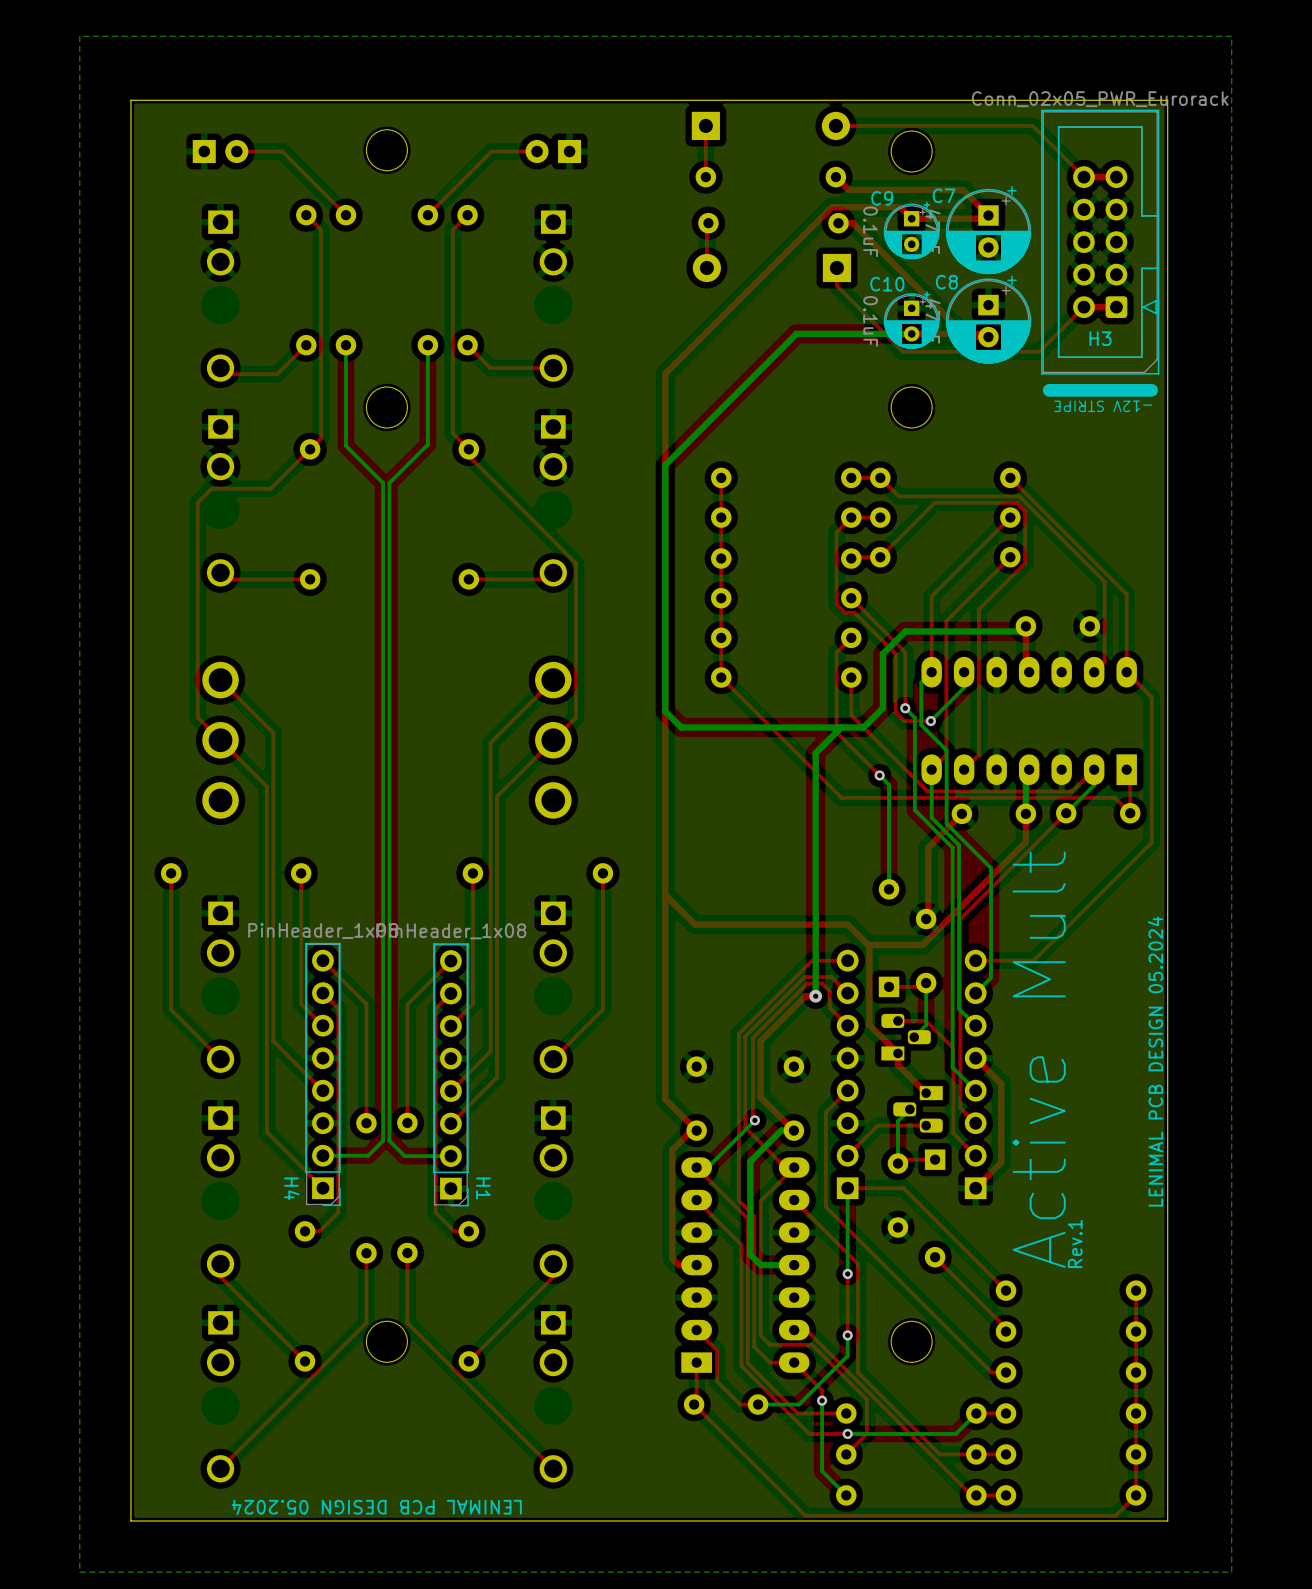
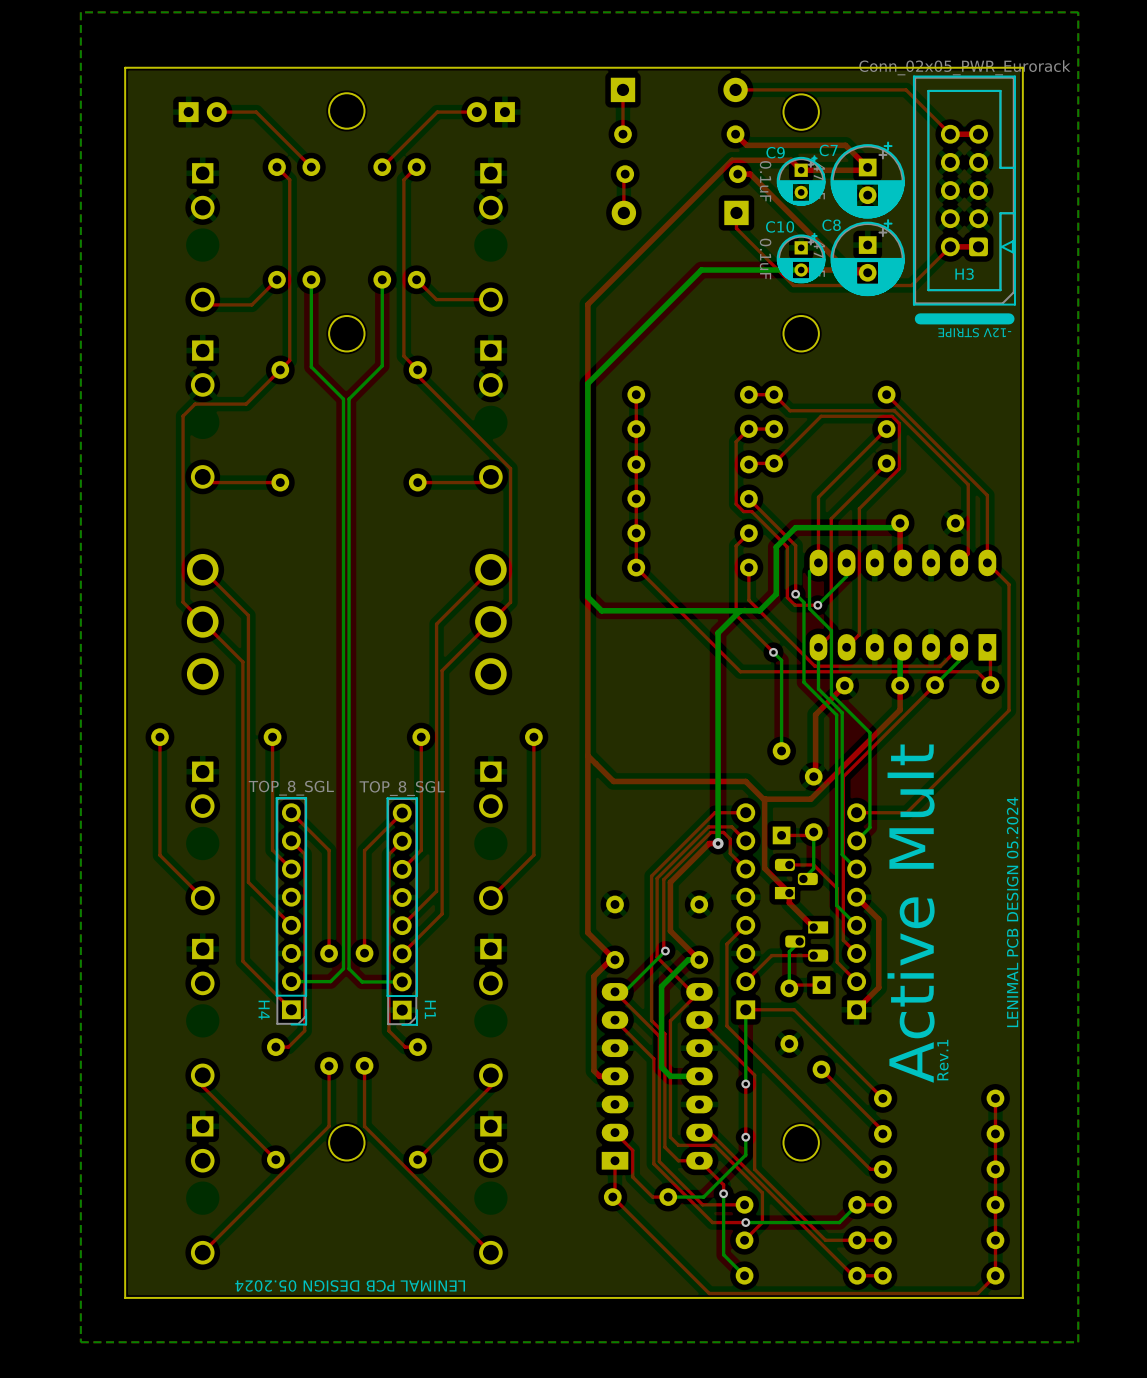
H4 value: PinHeader_1x08 (323, 930) -> TOP_8_SGL (291, 788)
H1 value: PinHeader_1x08 (451, 931) -> TOP_8_SGL (402, 788)

